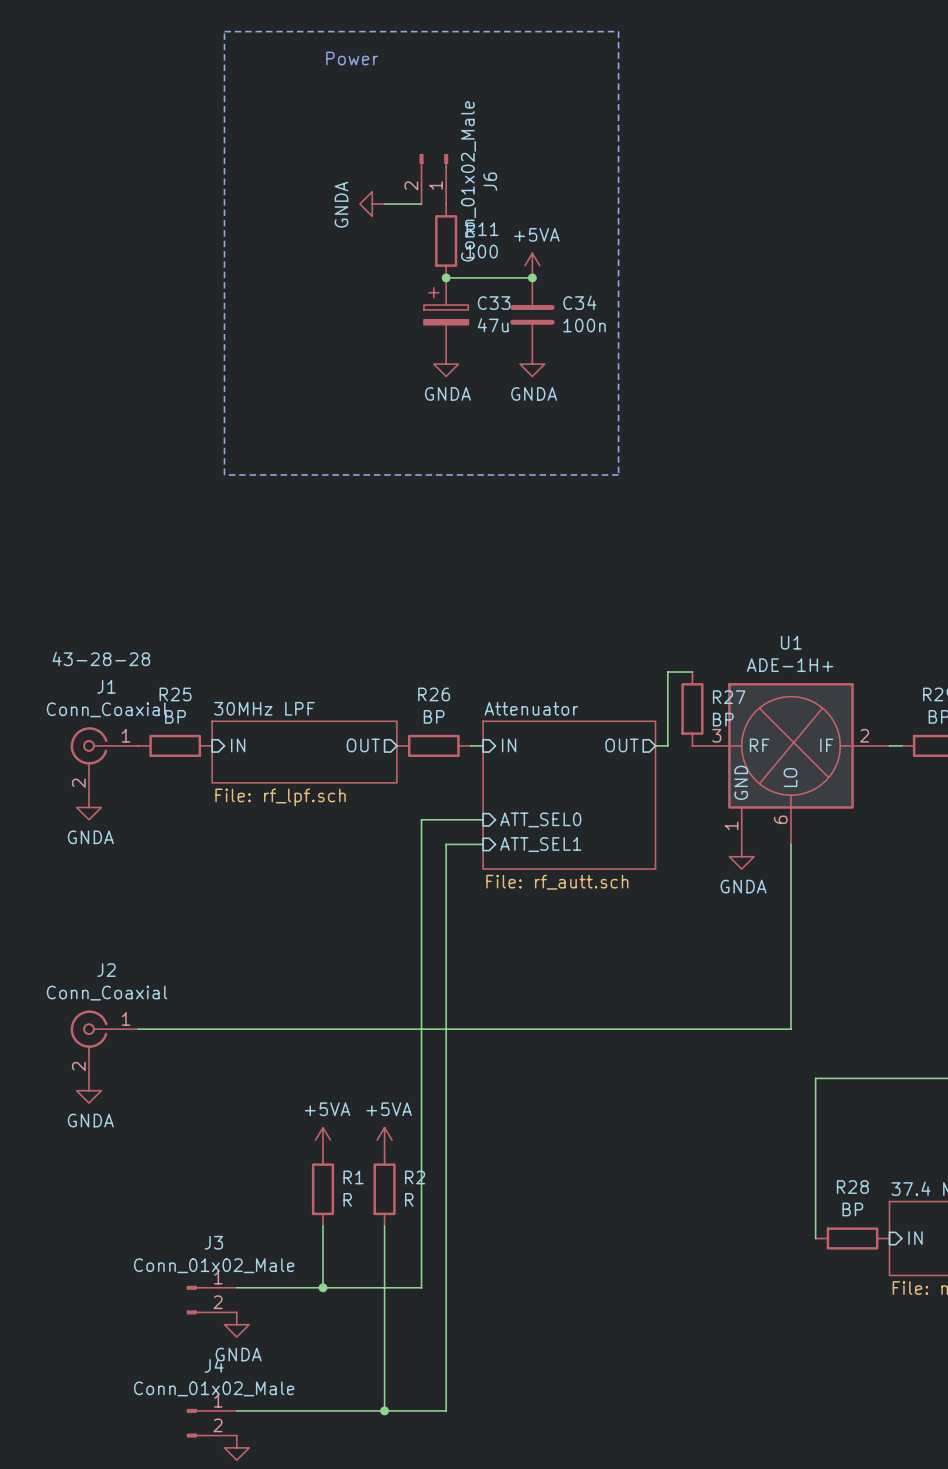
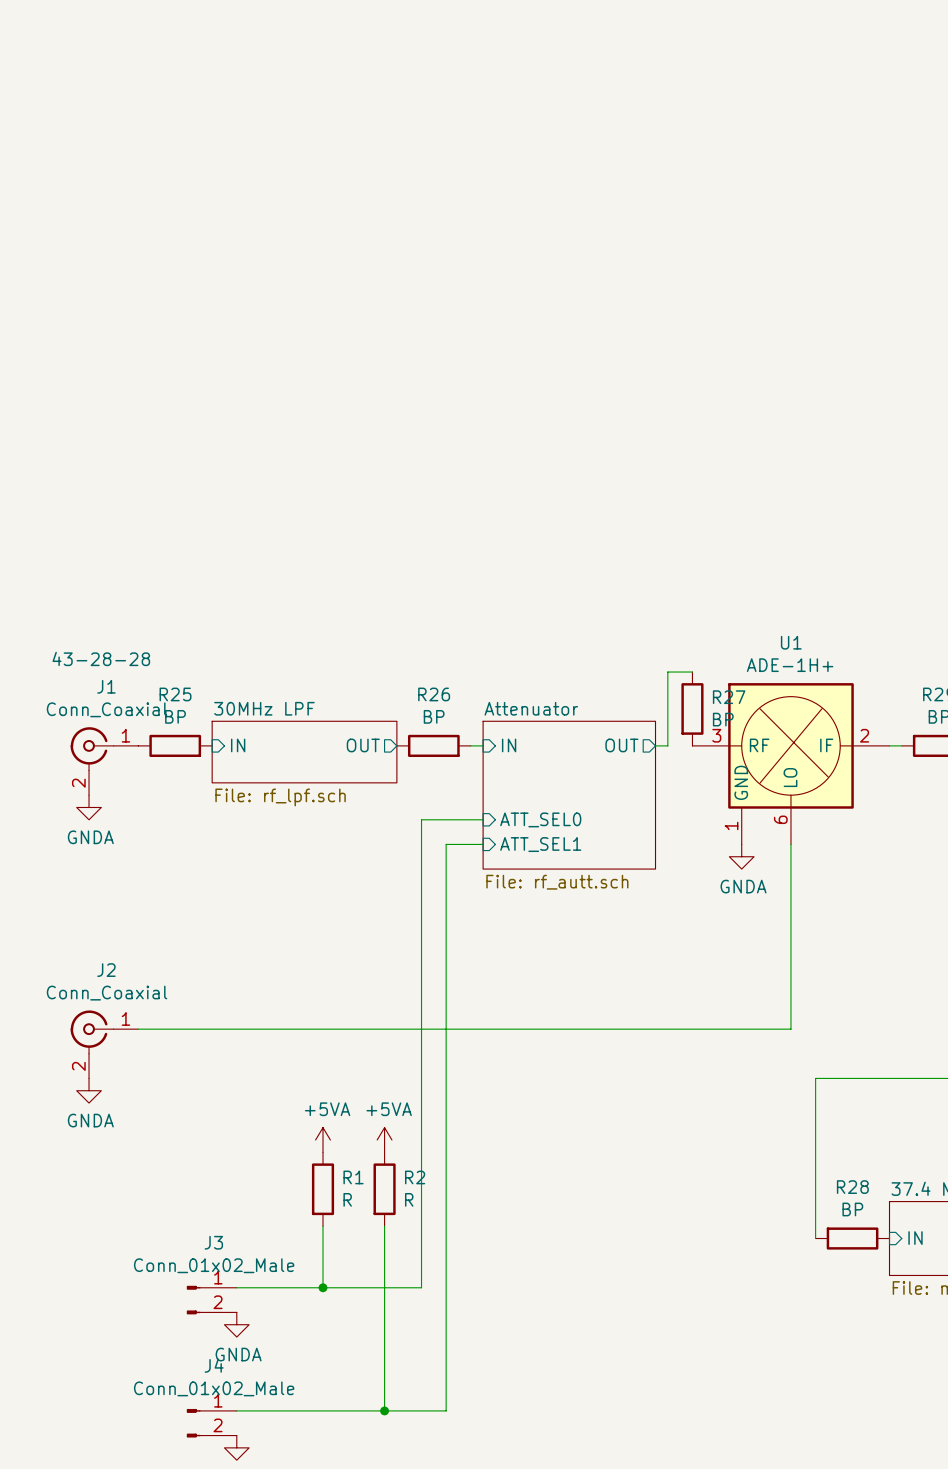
line: (224, 31) (224, 474) (618, 474) (618, 31) (224, 31) -> none
text: Power (352, 58) -> none
J6: Conn_01x02_Male (433, 179) -> none
power symbol: GNDA (372, 204) -> none
wire: (384, 204) (421, 204) -> none
R11: 100 (446, 240) -> none
power symbol: +5VA (532, 265) -> none
wire: (446, 277) (532, 277) -> none
junction: (446, 277) -> none
junction: (532, 277) -> none
C33: 47u (446, 314) -> none
C34: 100n (532, 314) -> none
power symbol: GNDA (446, 364) -> none
power symbol: GNDA (532, 364) -> none

